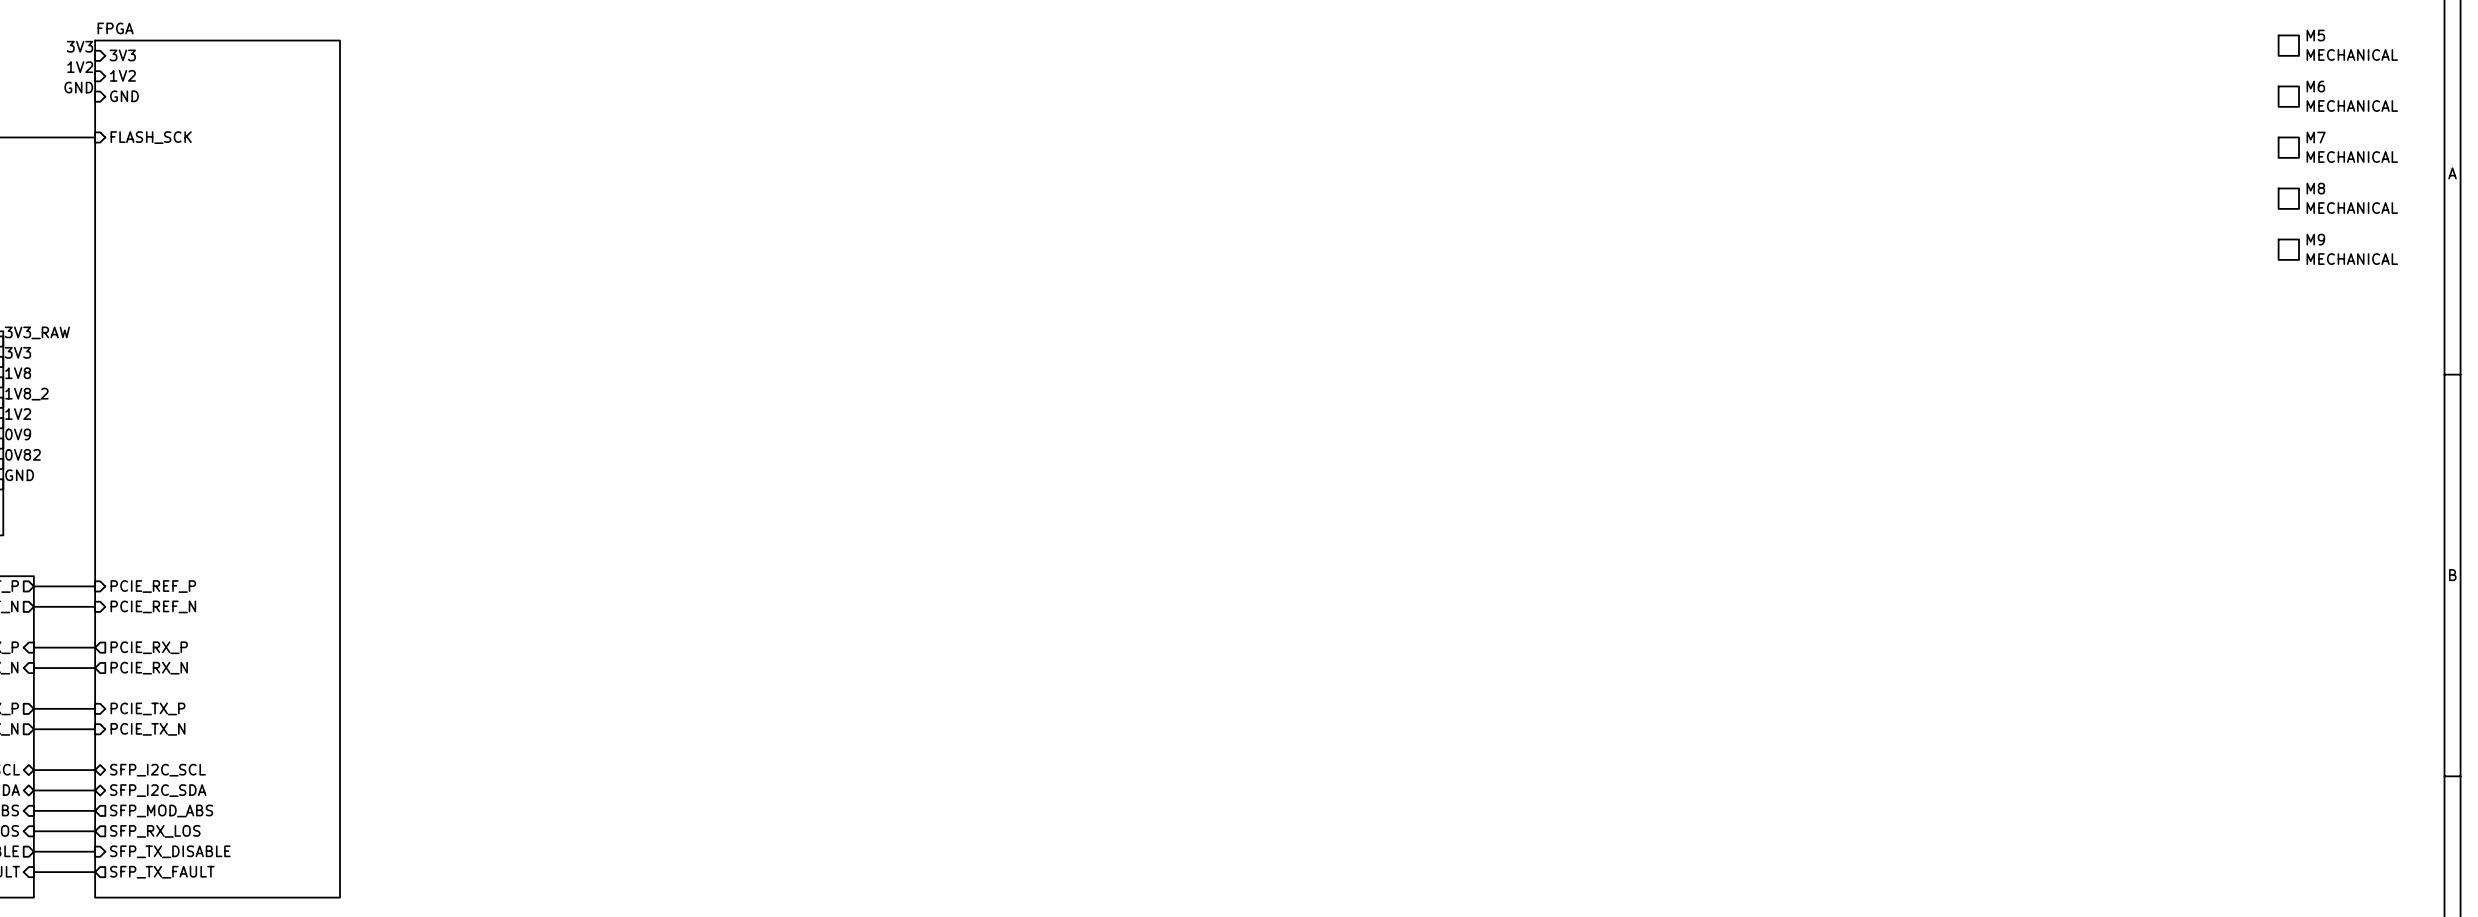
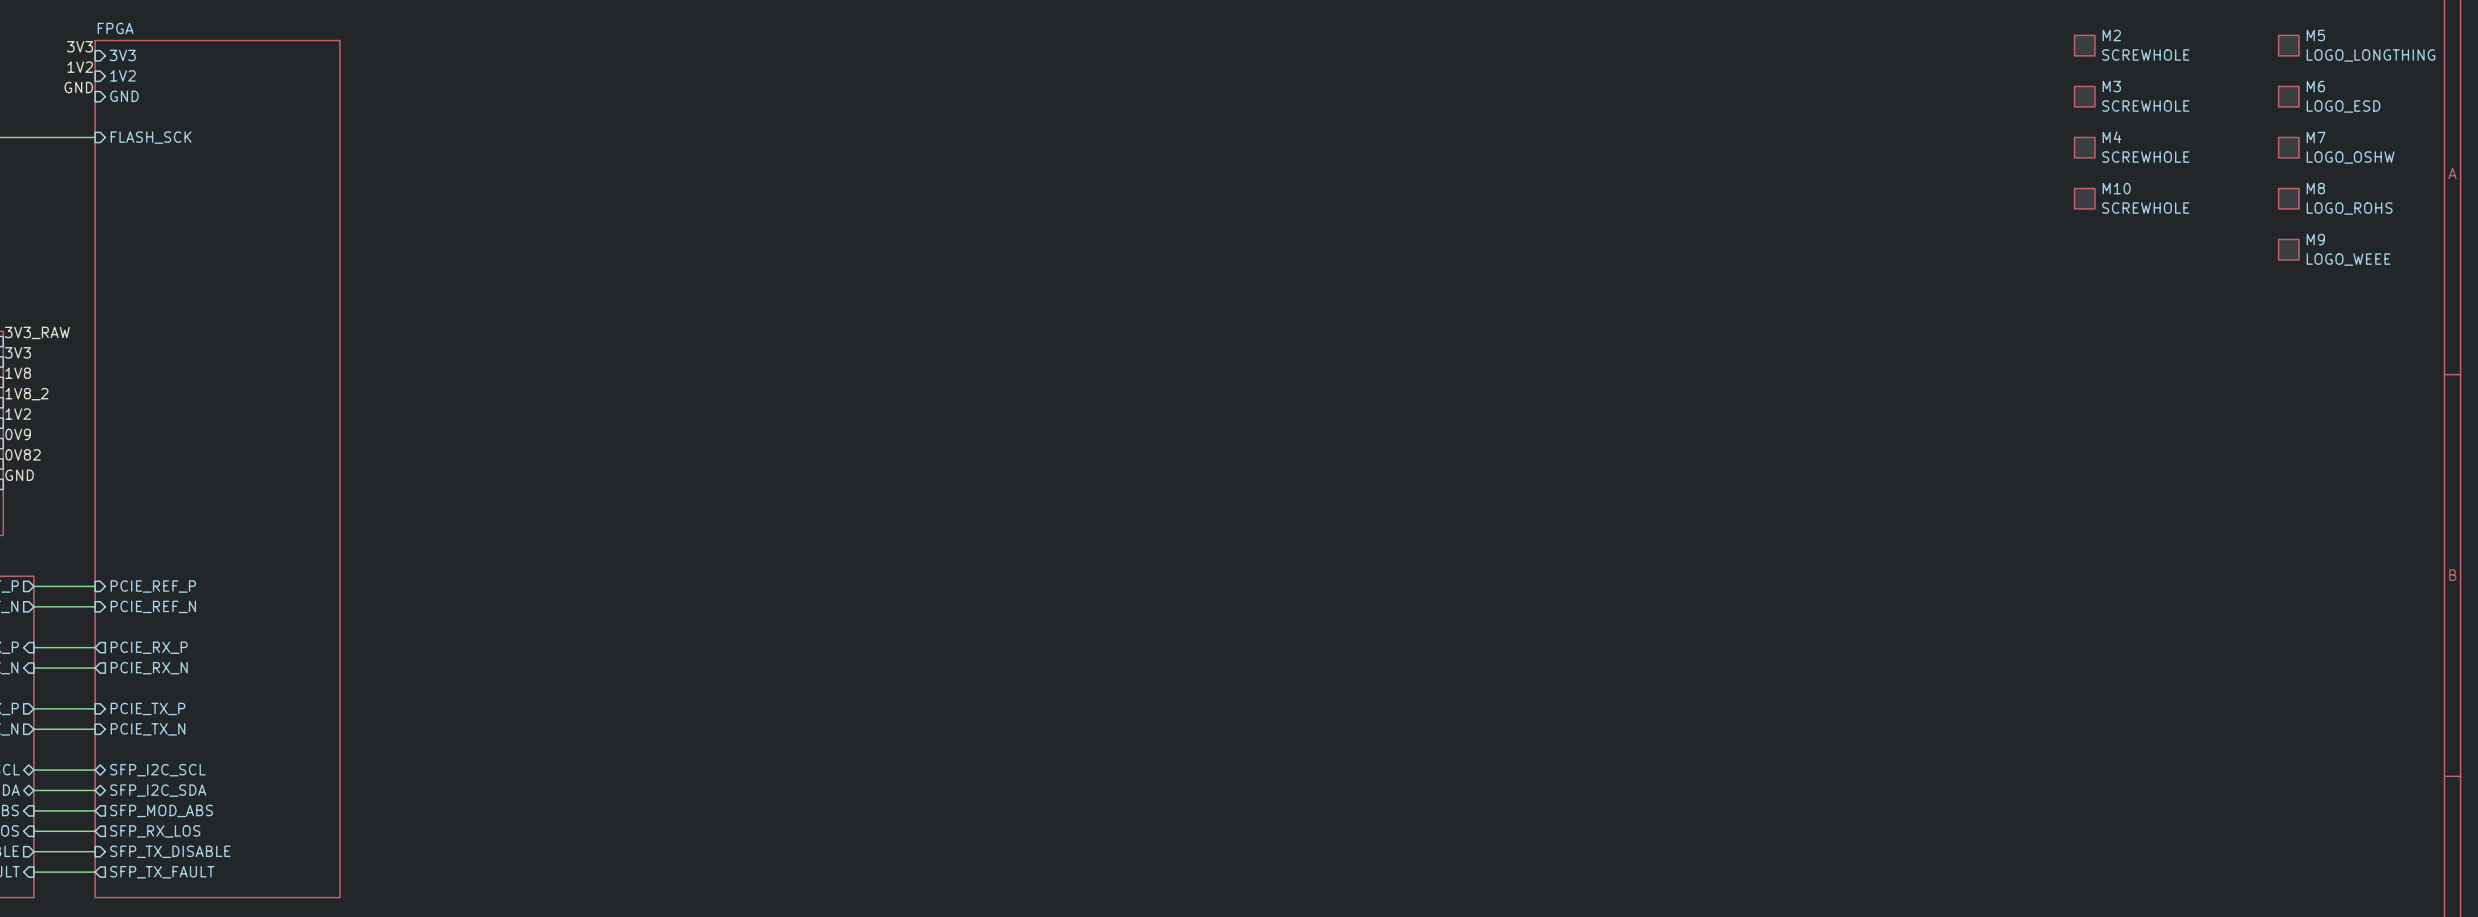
M2: none -> SCREWHOLE (2084, 45)
M5 value: MECHANICAL (2352, 55) -> LOGO_LONGTHING (2370, 55)
M3: none -> SCREWHOLE (2084, 96)
M6 value: MECHANICAL (2352, 106) -> LOGO_ESD (2343, 106)
M4: none -> SCREWHOLE (2084, 147)
M7 value: MECHANICAL (2352, 157) -> LOGO_OSHW (2350, 157)
M10: none -> SCREWHOLE (2084, 198)
M8 value: MECHANICAL (2352, 208) -> LOGO_ROHS (2349, 208)
M9 value: MECHANICAL (2352, 259) -> LOGO_WEEE (2348, 259)

